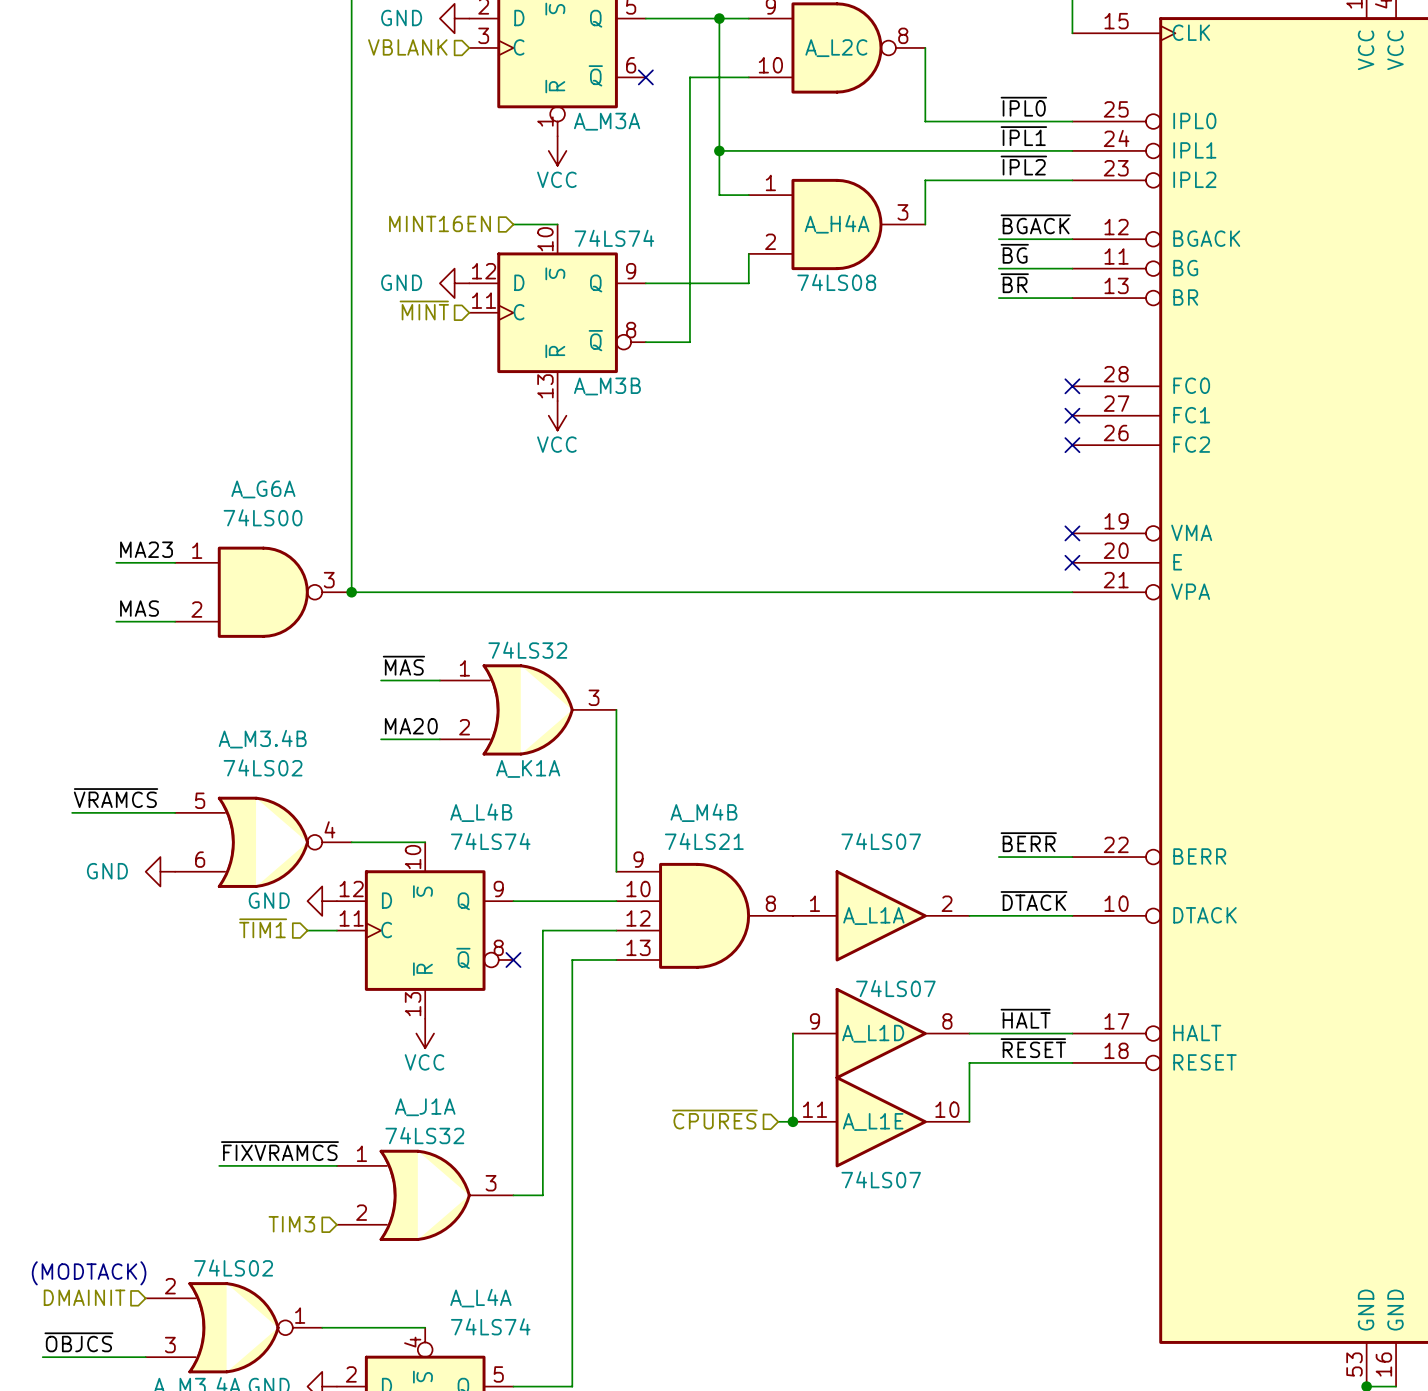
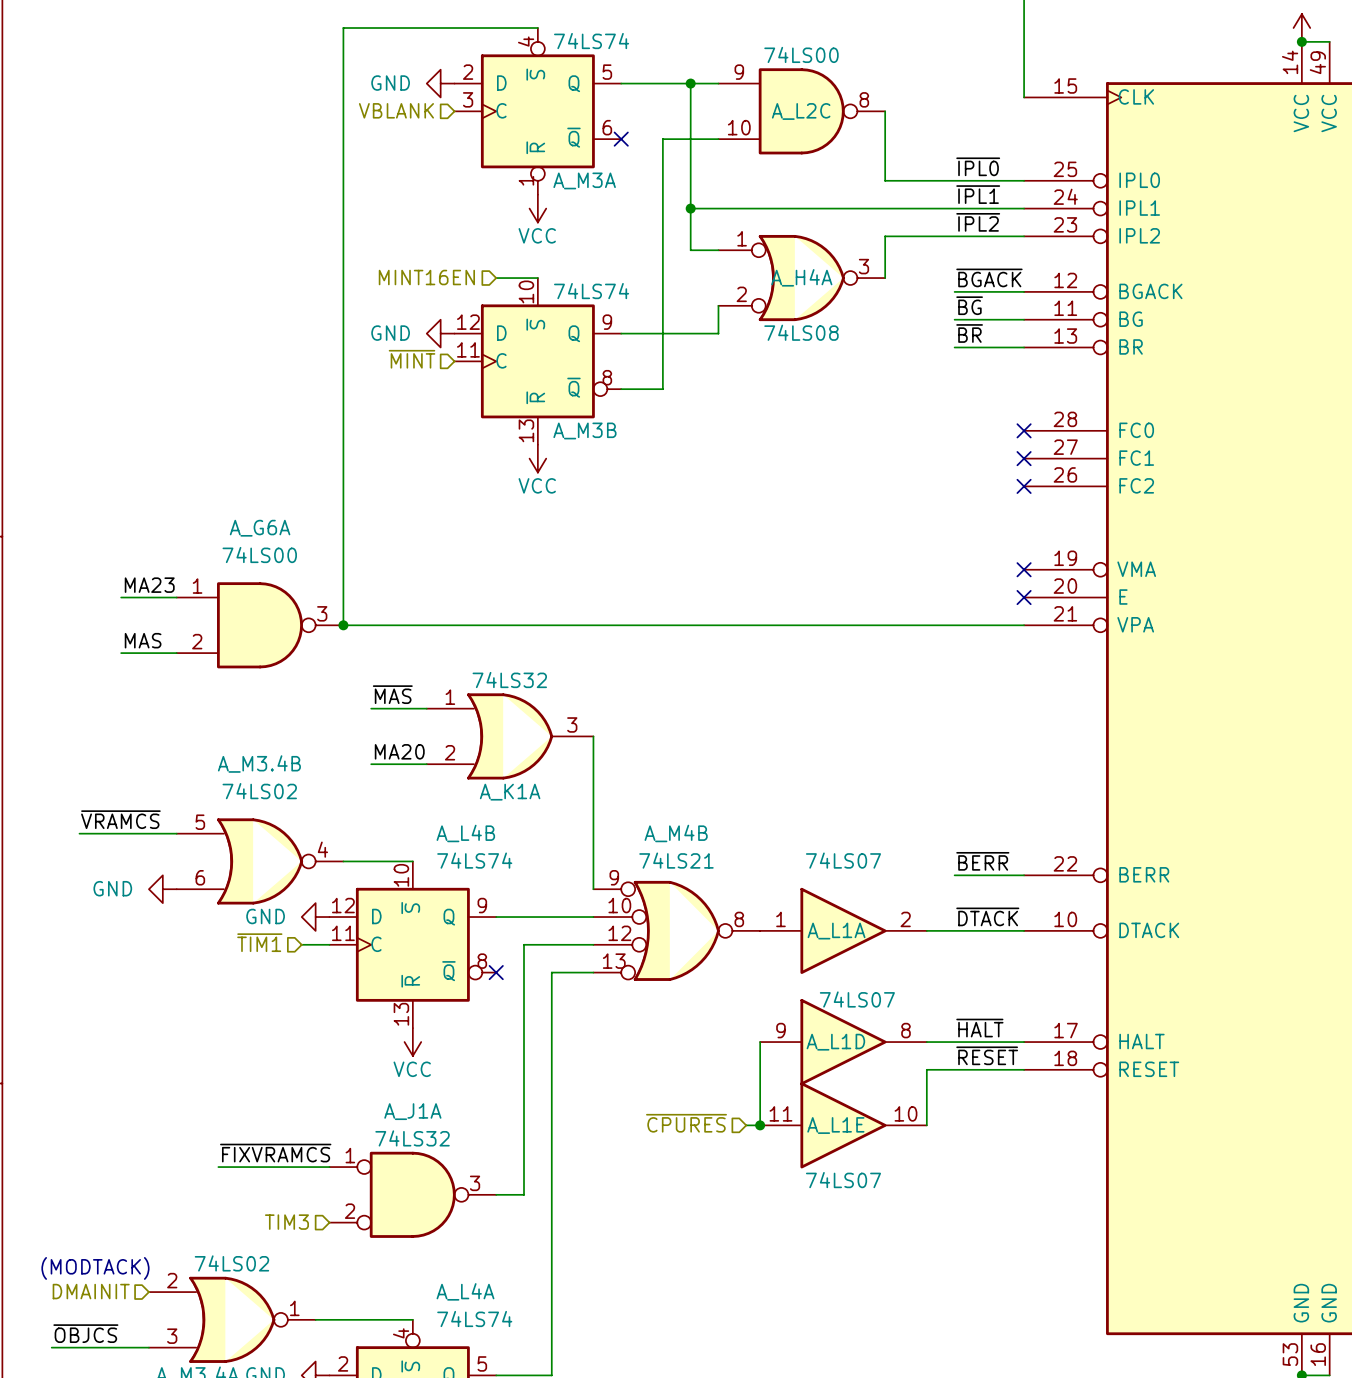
A_H4A symbol: [748, 178, 926, 271] -> [718, 234, 886, 322]
A_M4B symbol: [616, 862, 793, 969] -> [593, 880, 761, 981]
A_J1A symbol: [336, 1149, 514, 1241] -> [329, 1151, 497, 1238]

